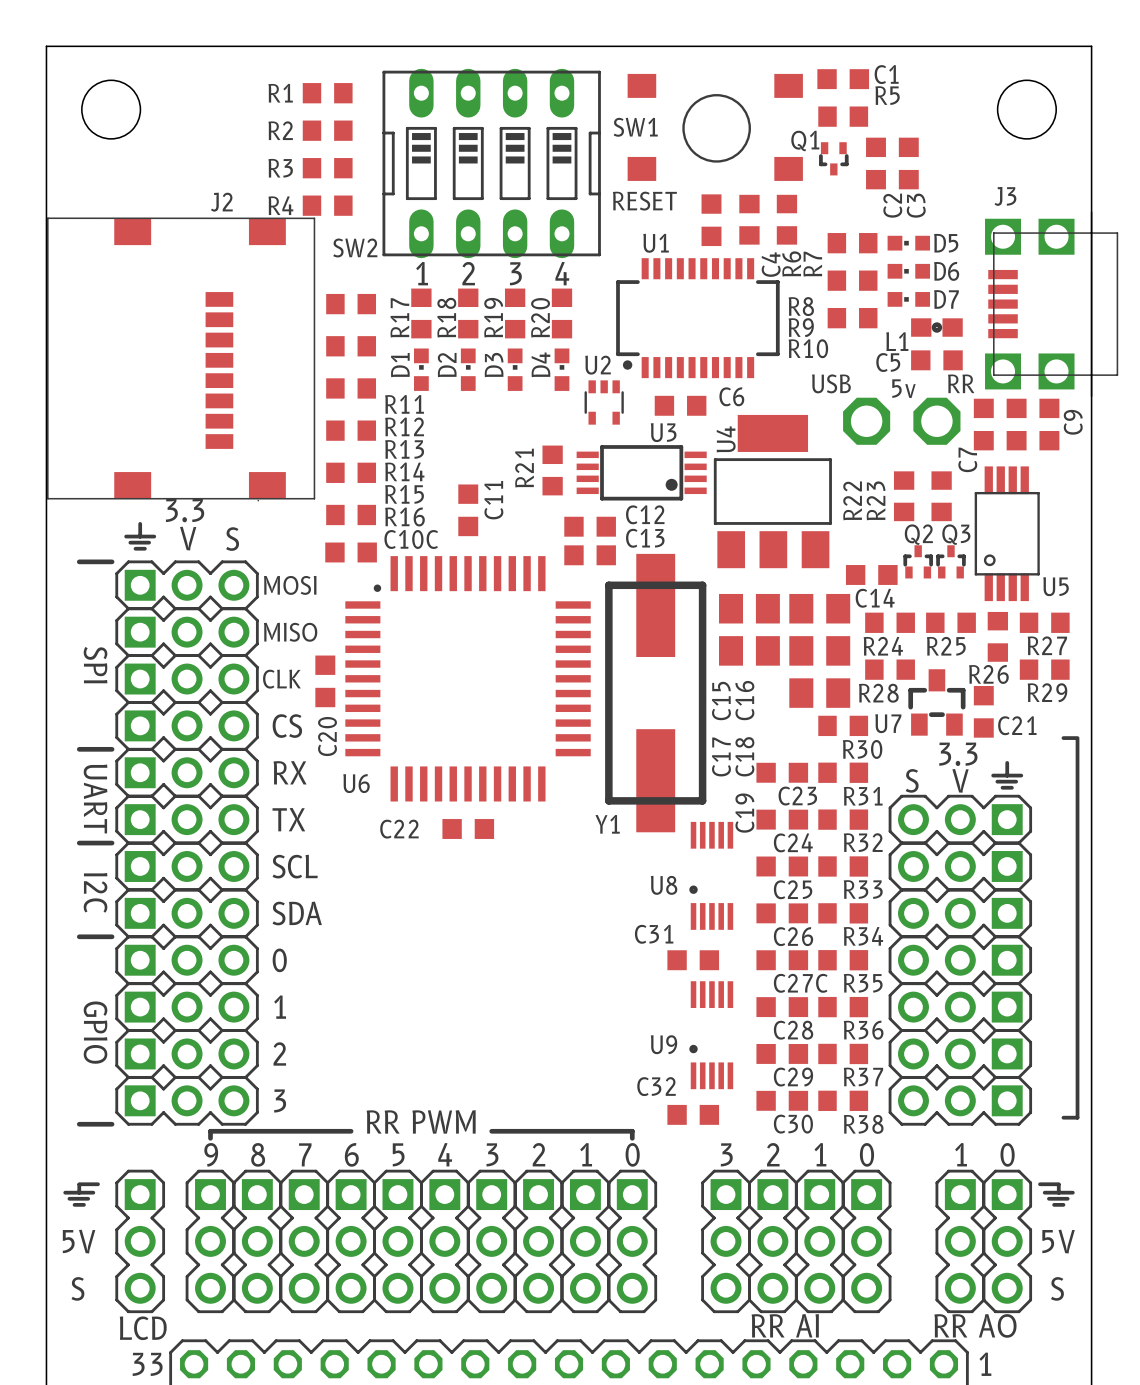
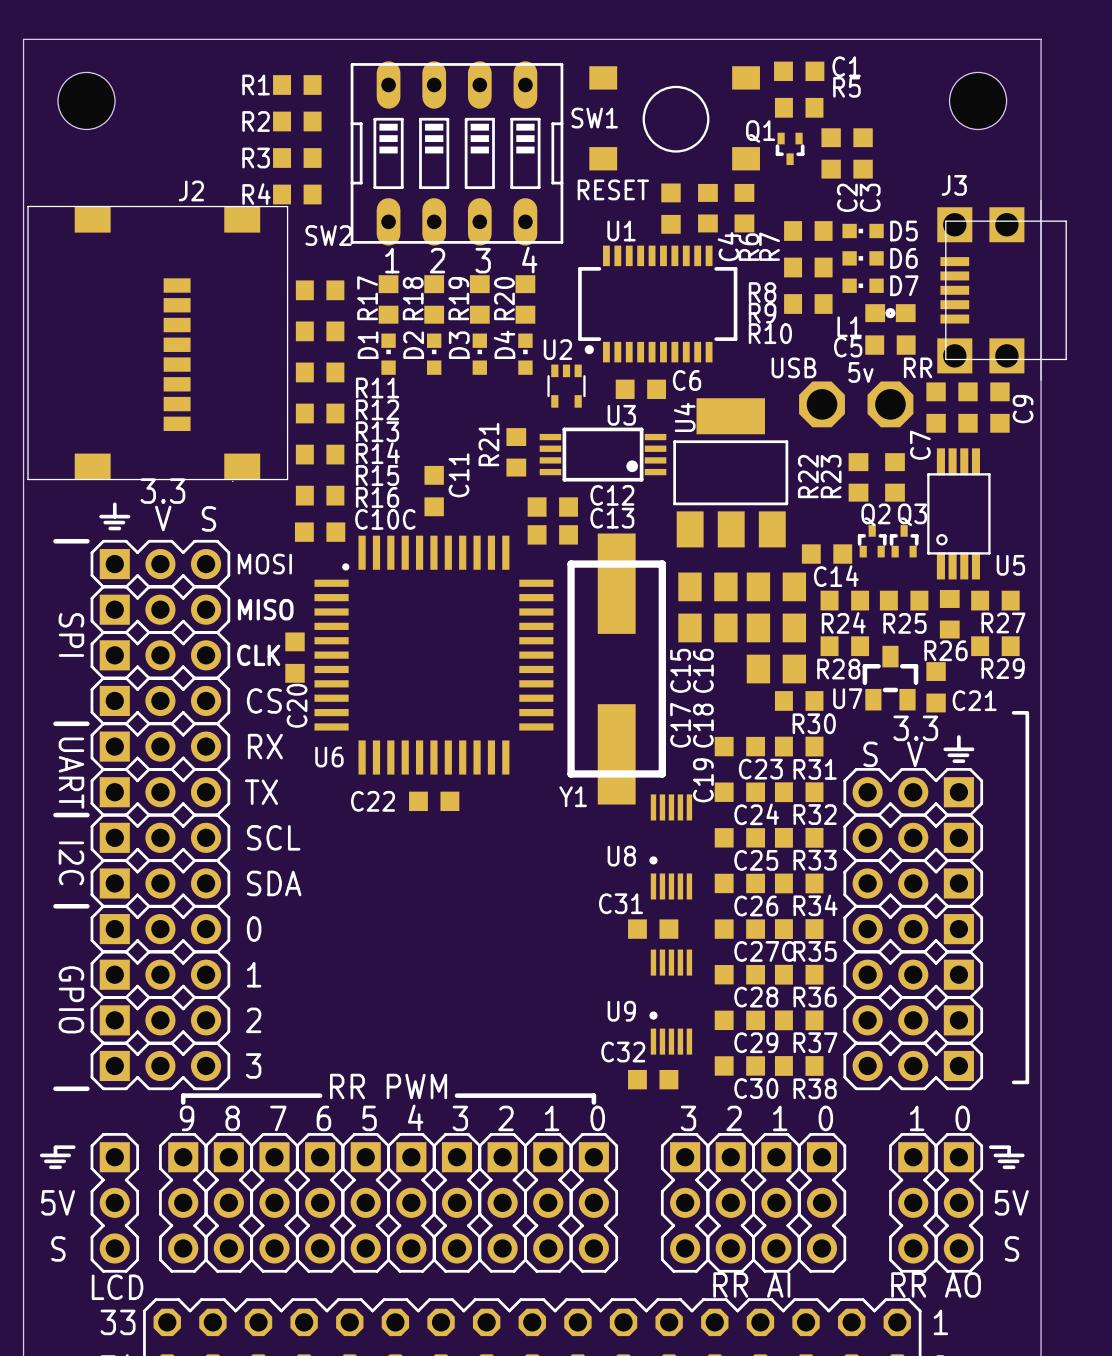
J2 footprint: [47, 218, 315, 501] -> [27, 206, 288, 482]

